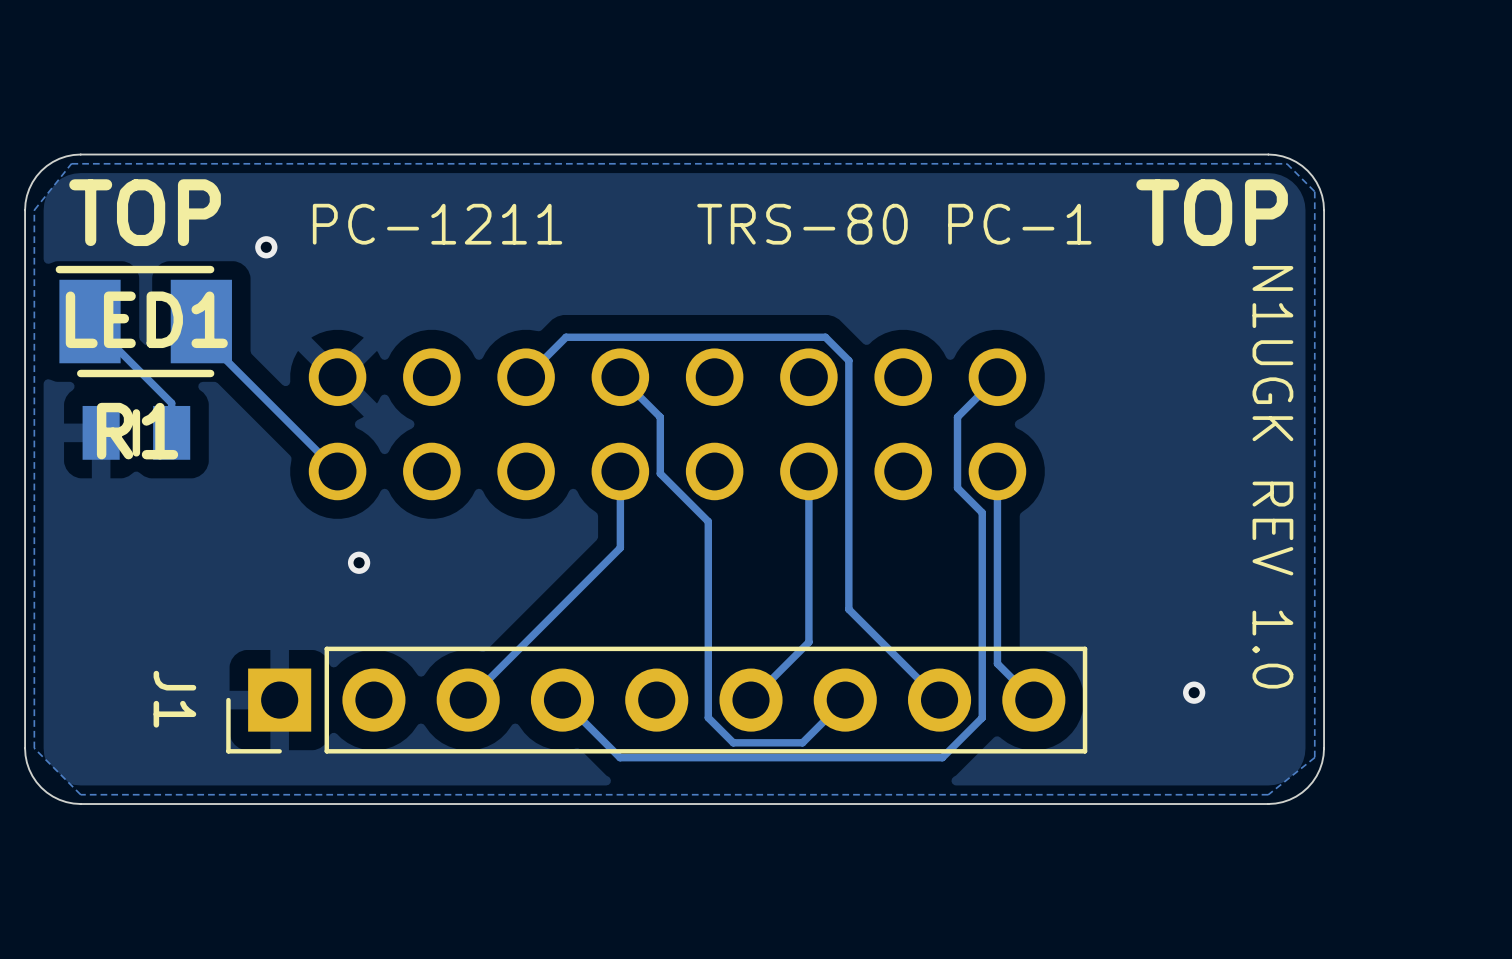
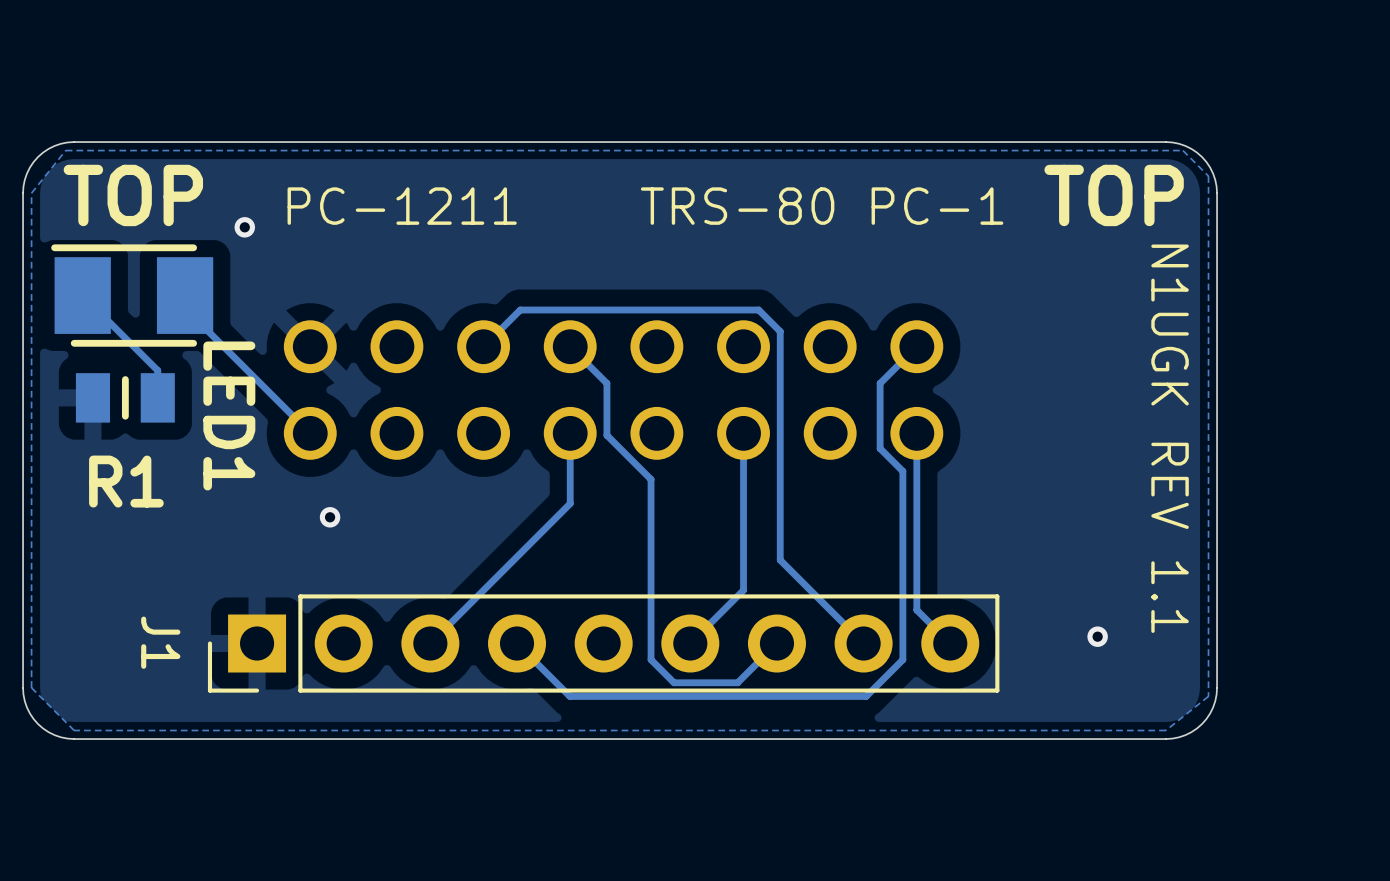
LED1 name rotation: 0° (146, 319) -> 90° clockwise (229, 415)
R1 name position: R1 (137, 431) -> R1 (126, 481)
text: N1UGK REV 1.0 (1272, 477) -> N1UGK REV 1.1 (1170, 438)

